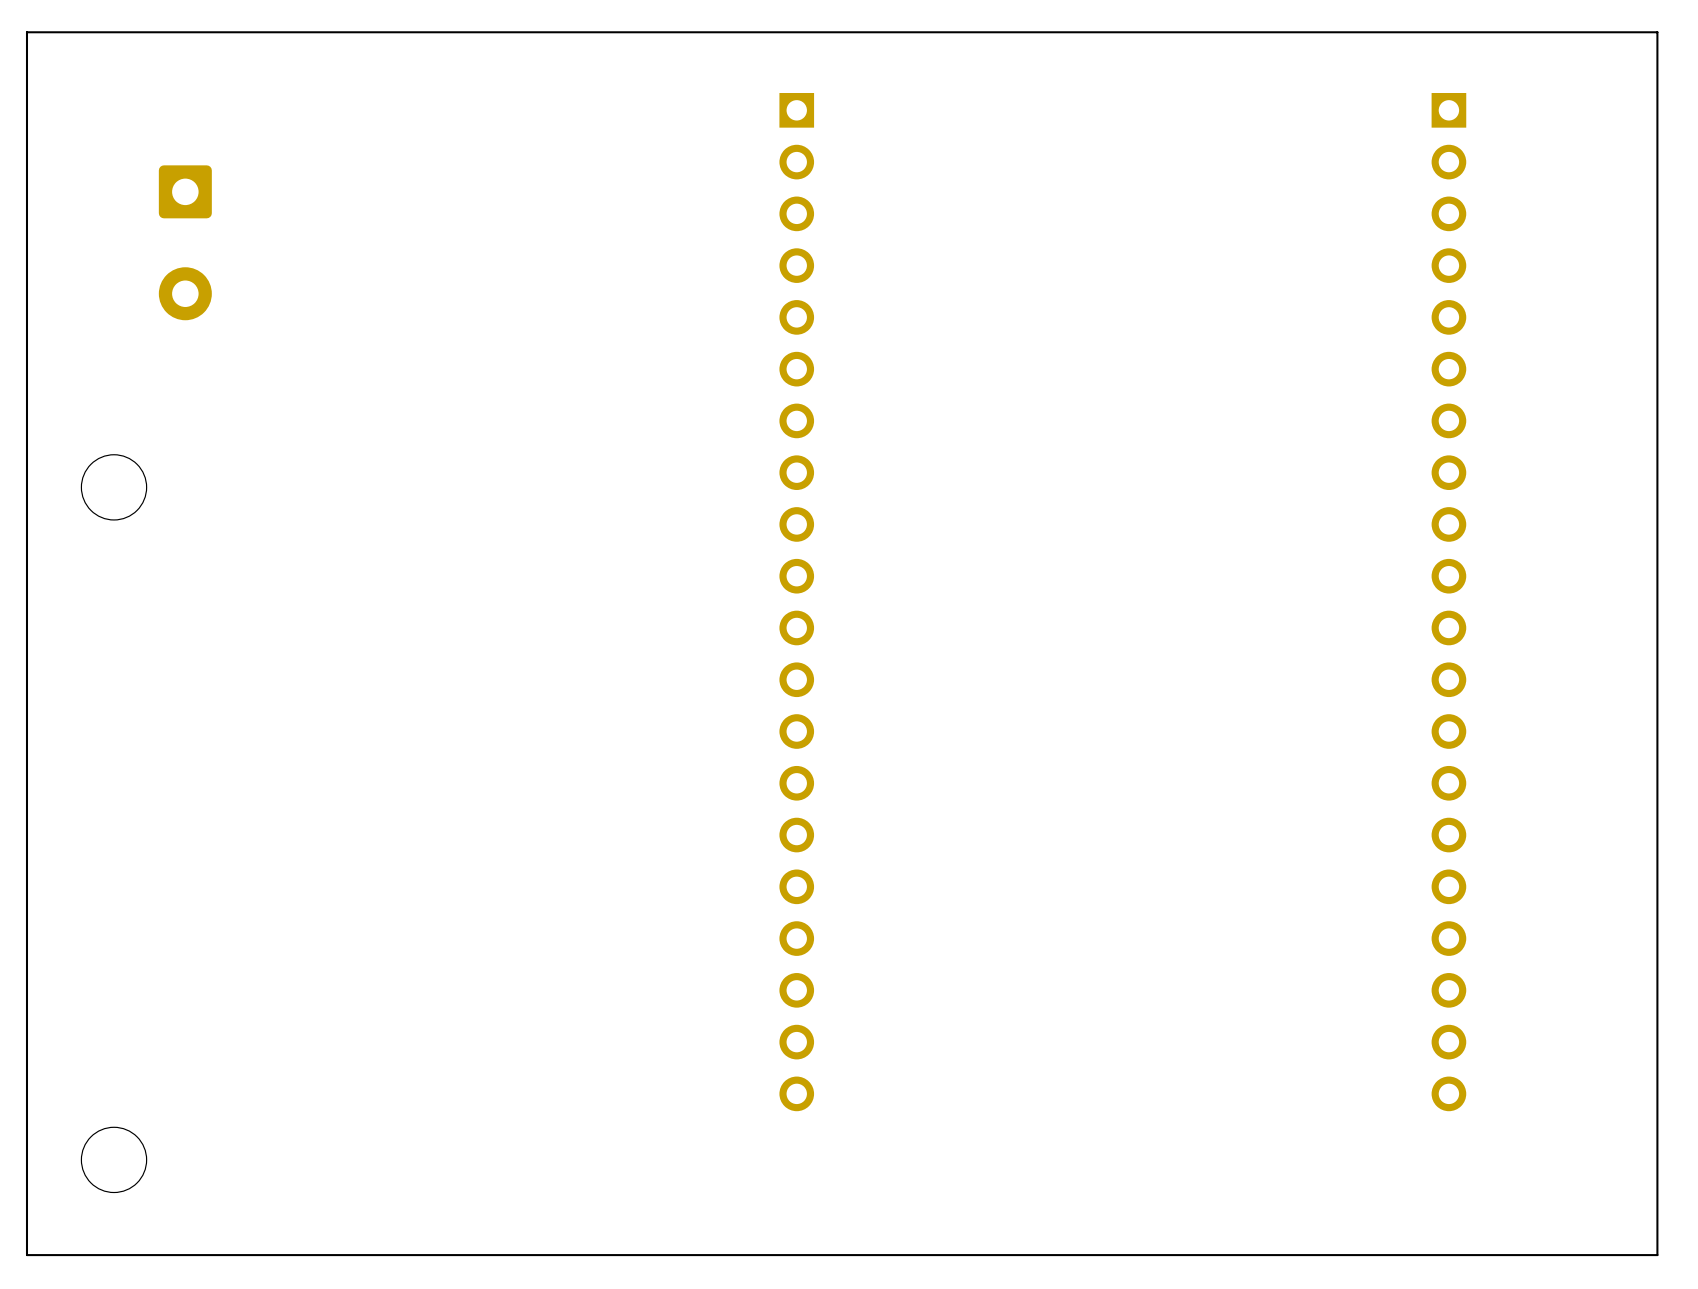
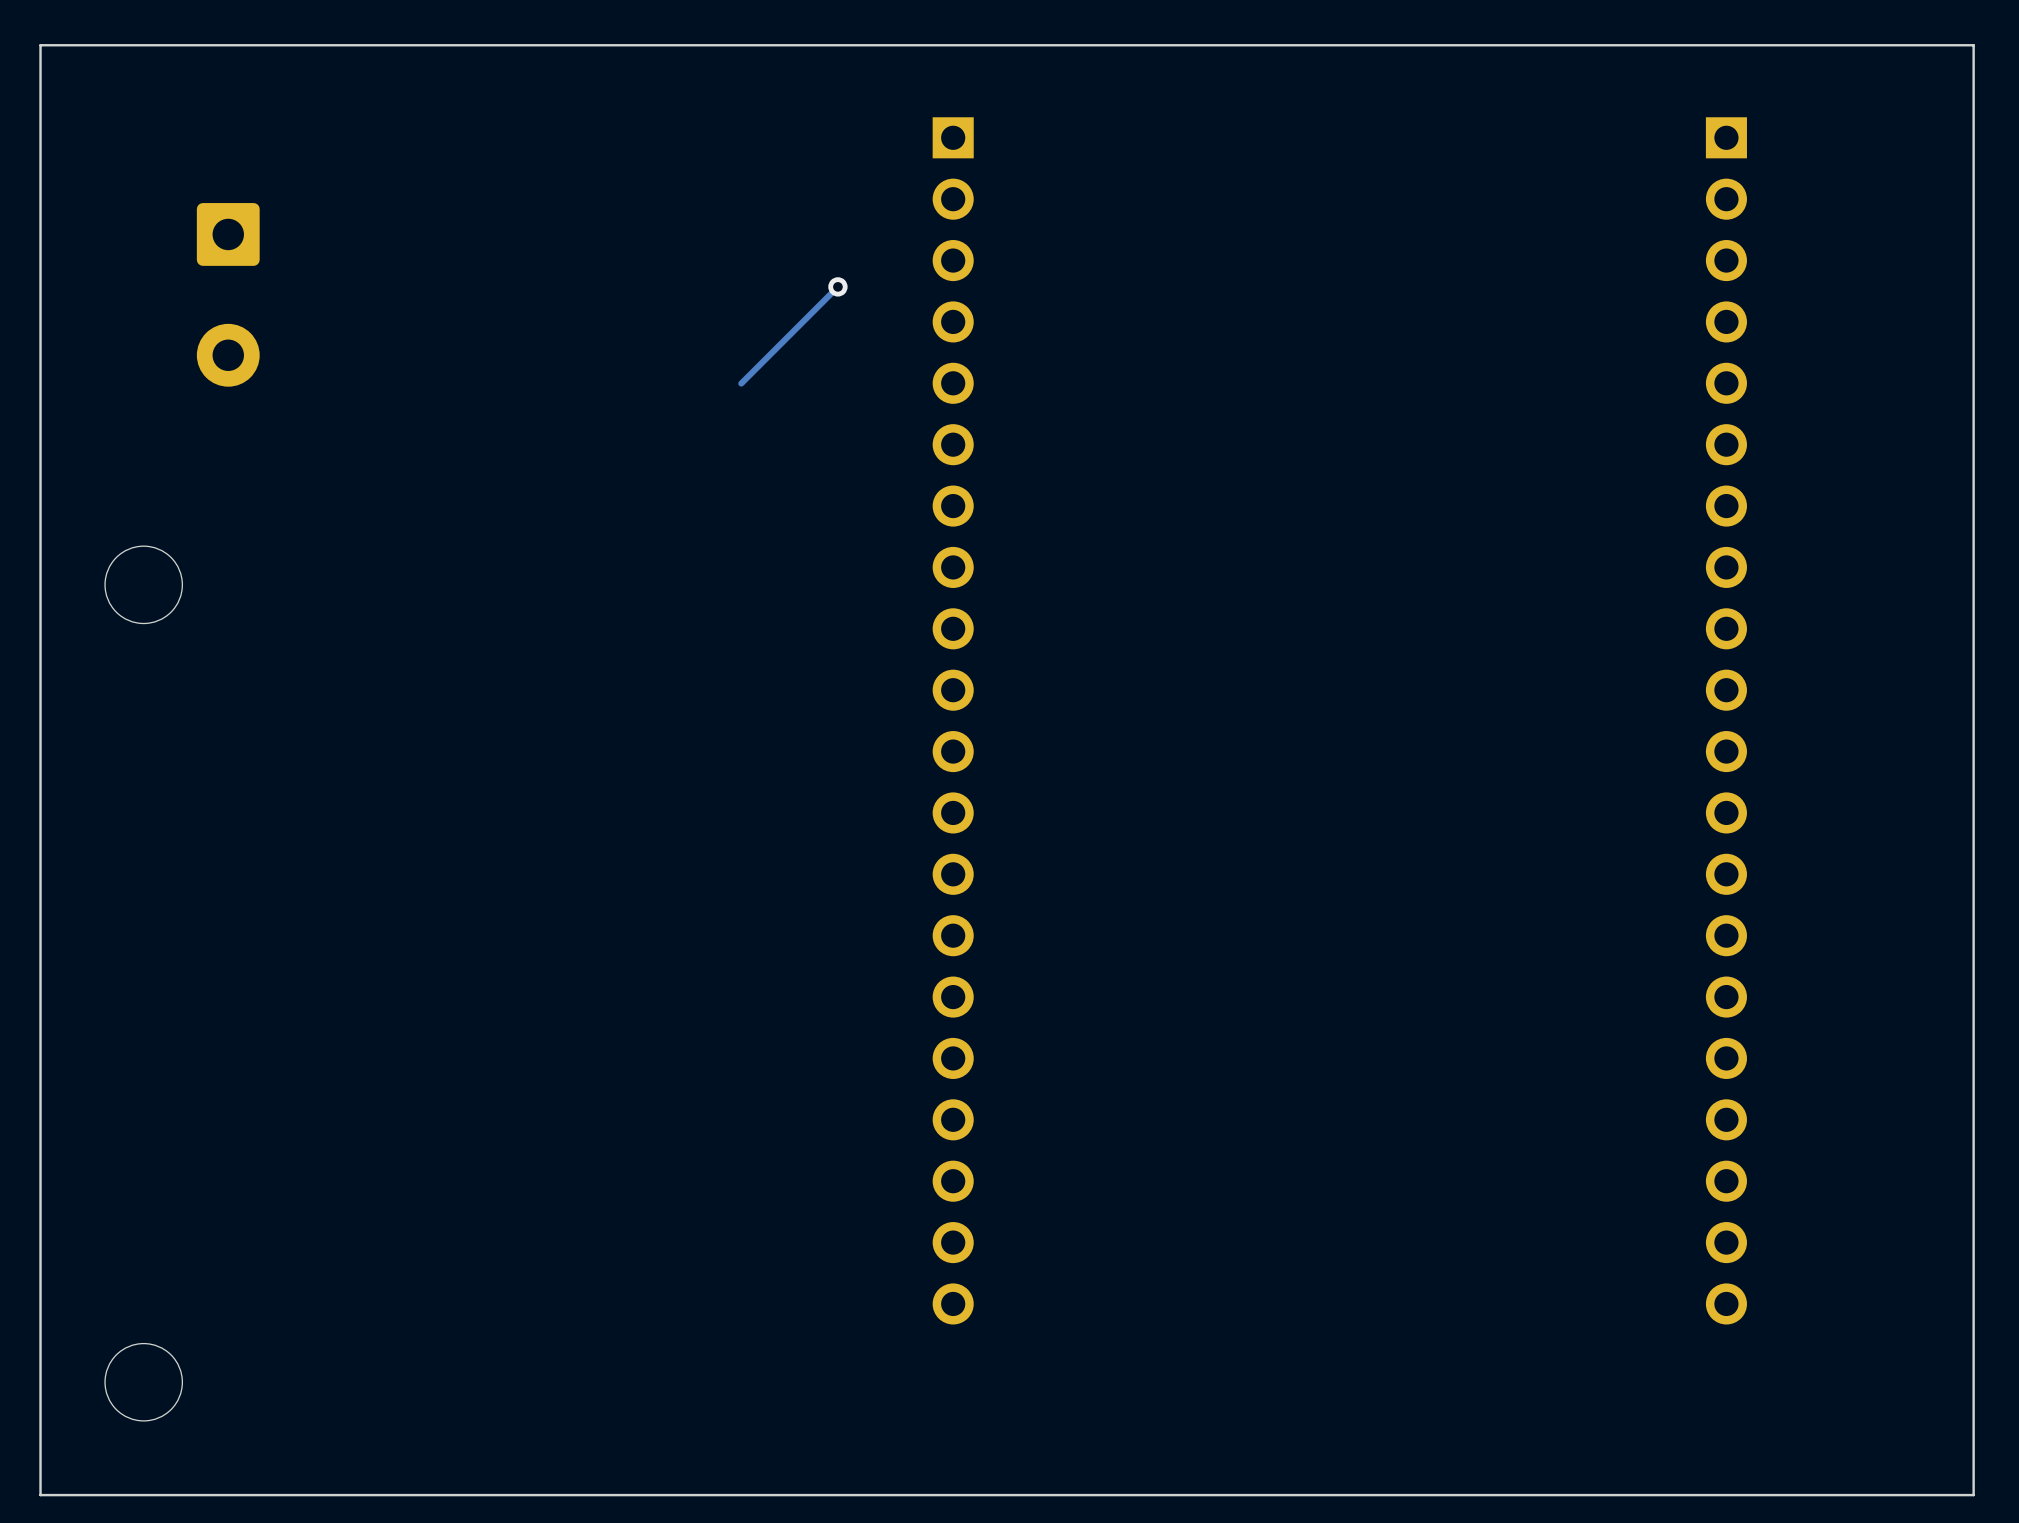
track: none -> (837, 286) (741, 383)
via: none -> (837, 286)

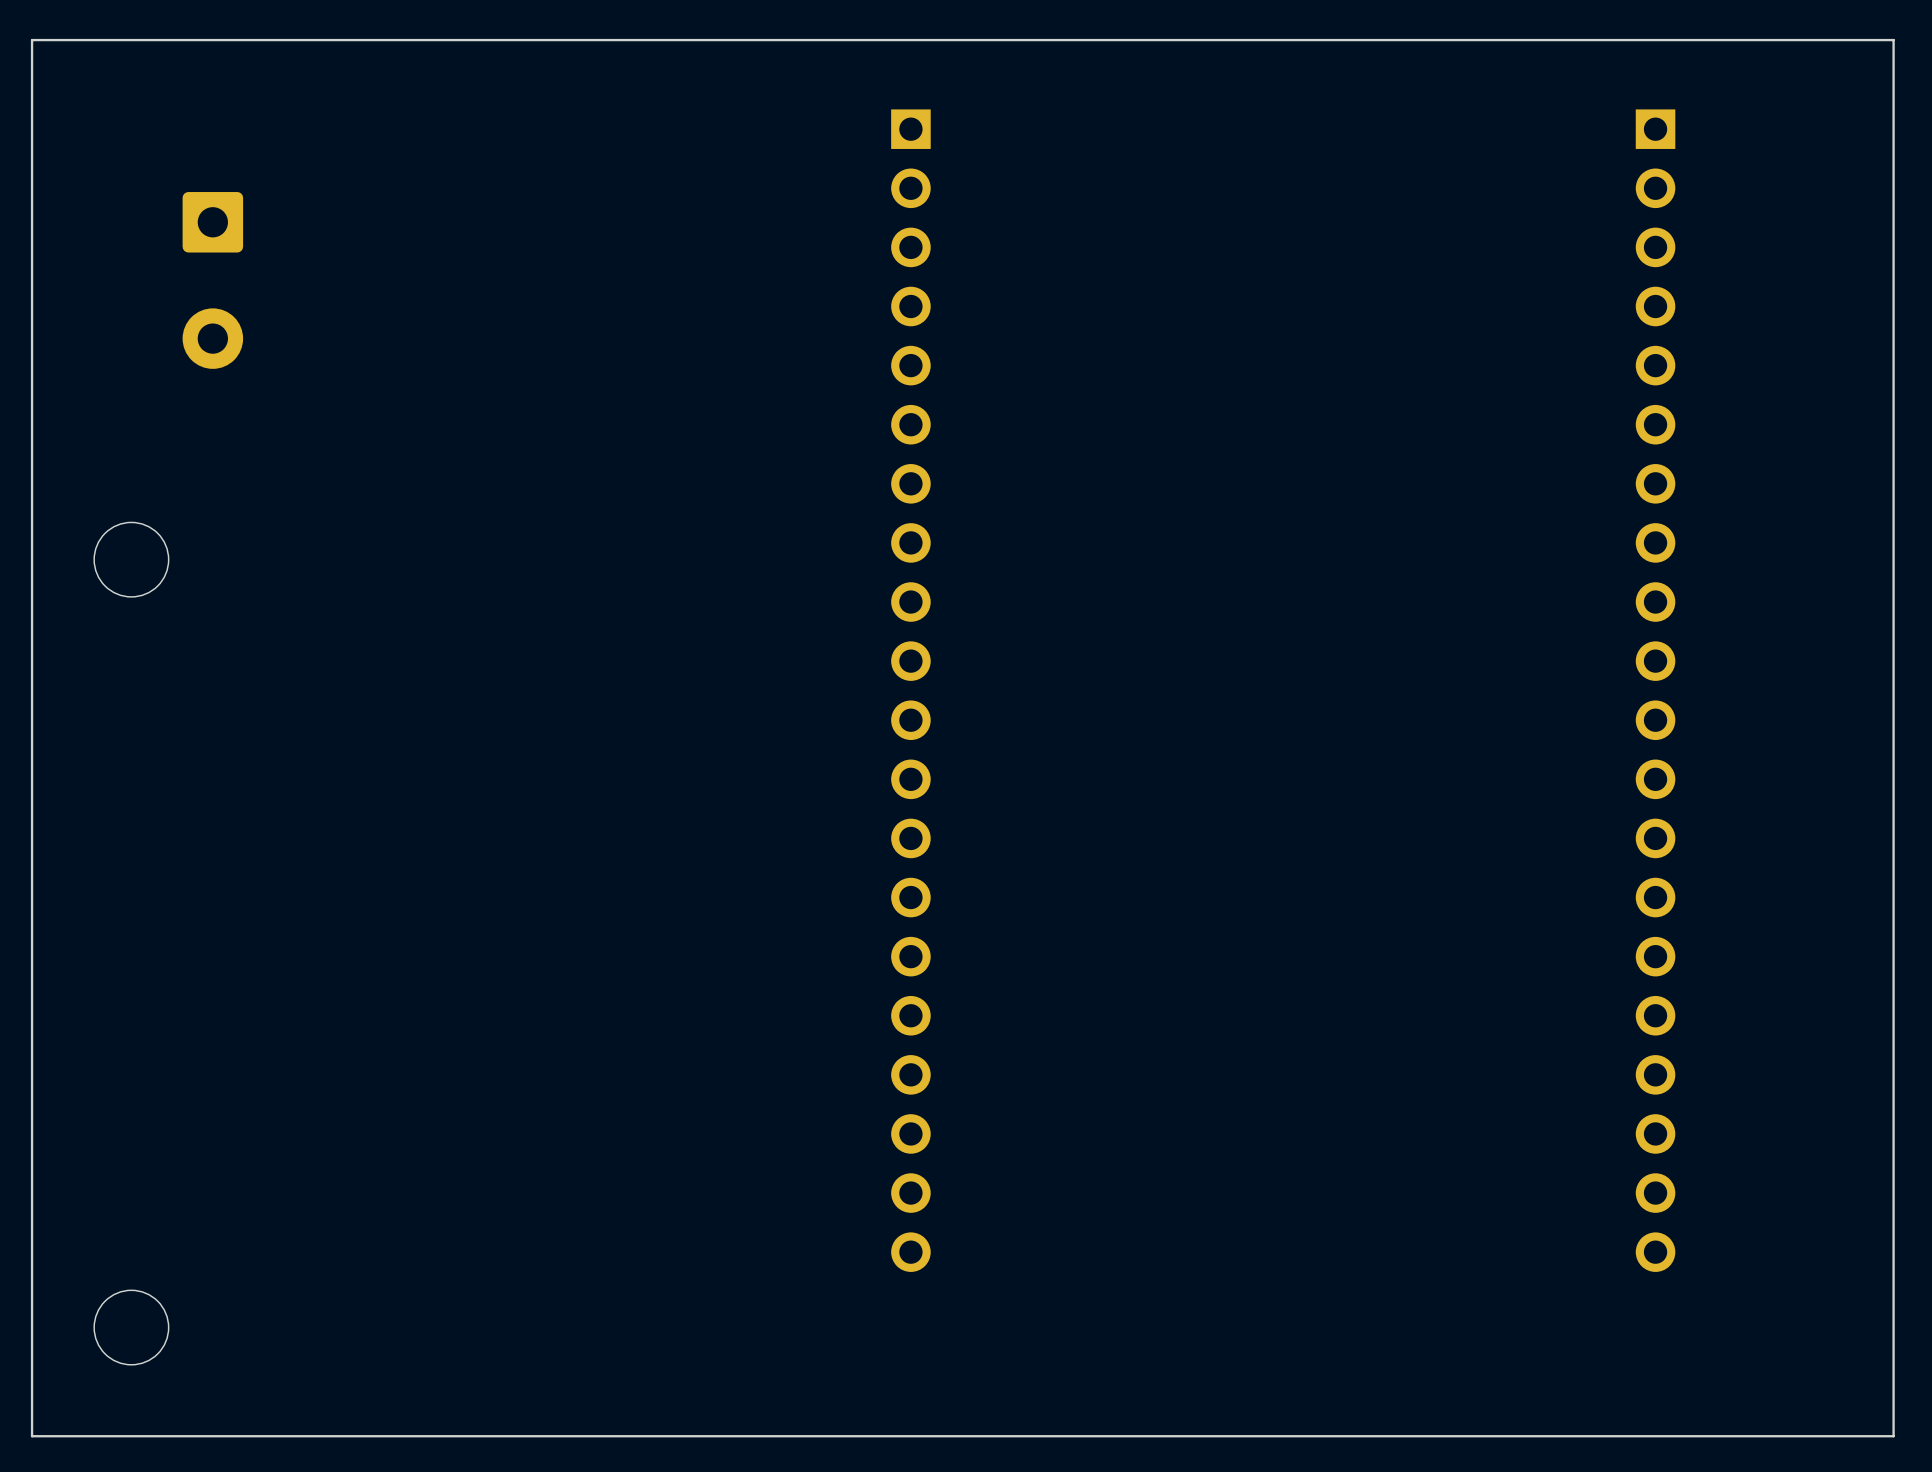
track: (837, 286) (741, 383) -> none
via: (837, 286) -> none

